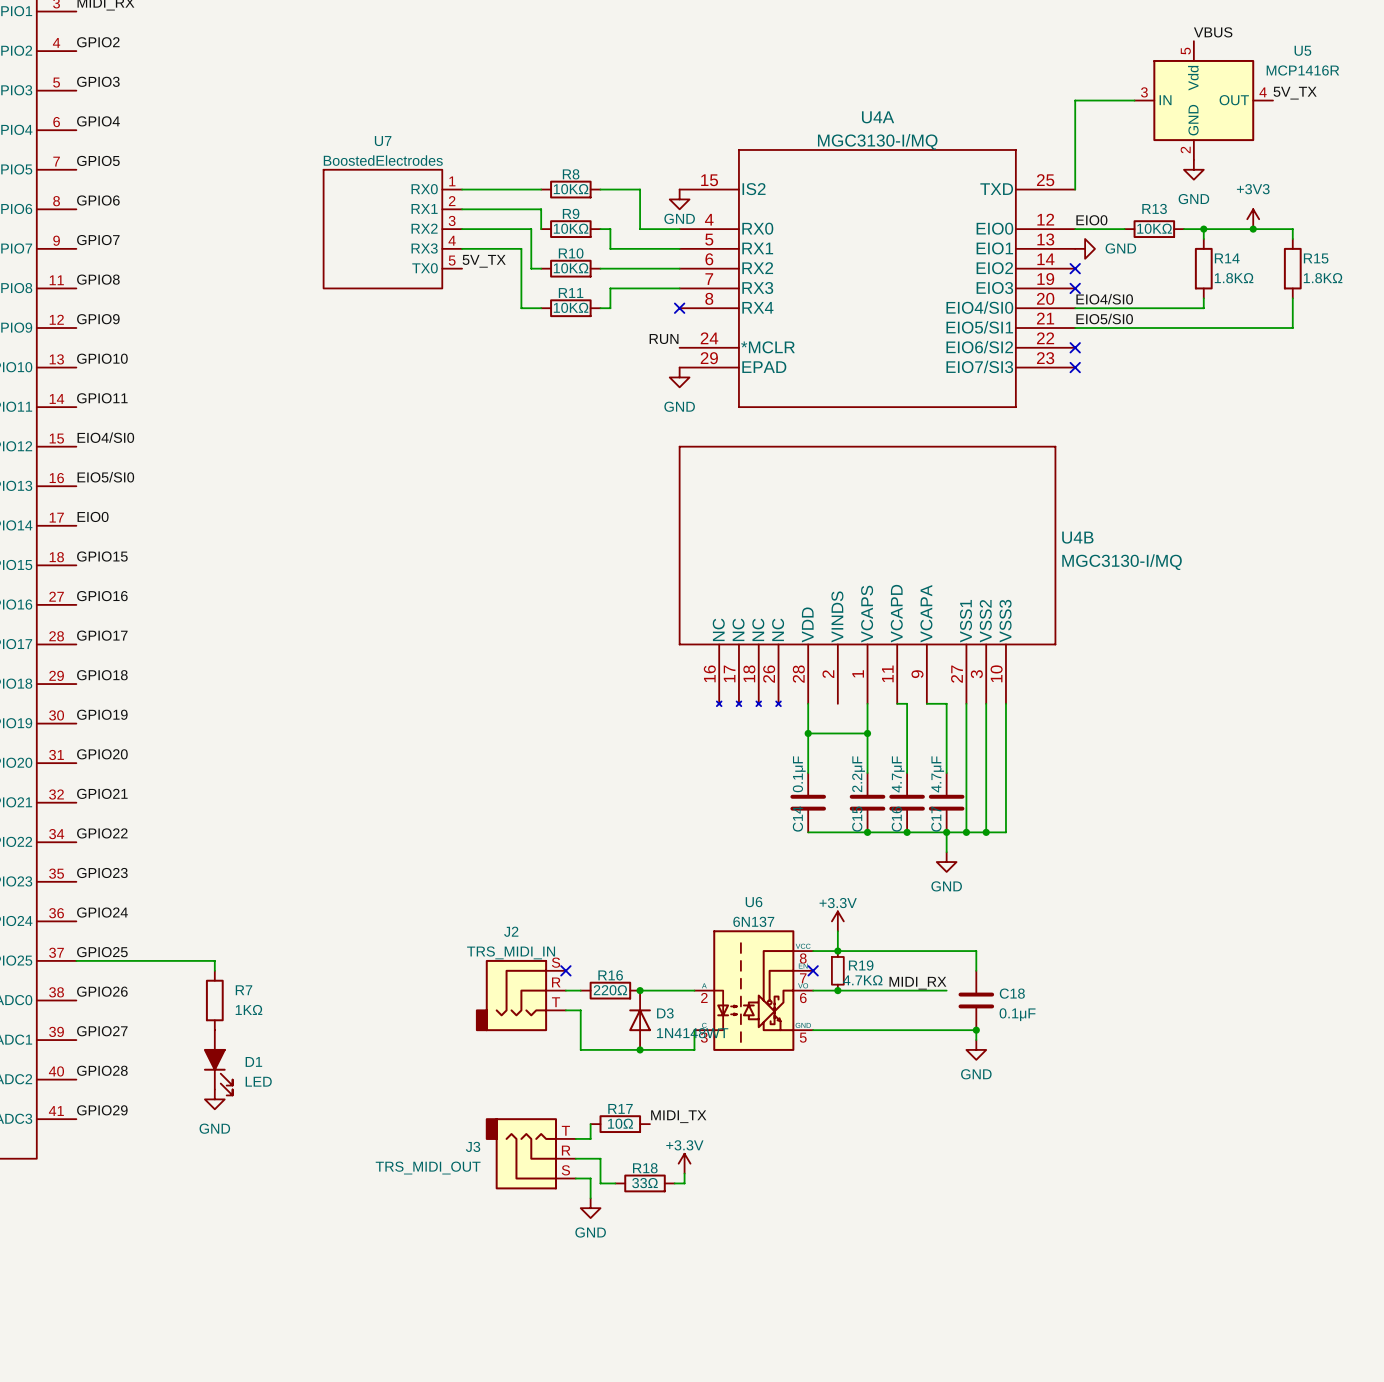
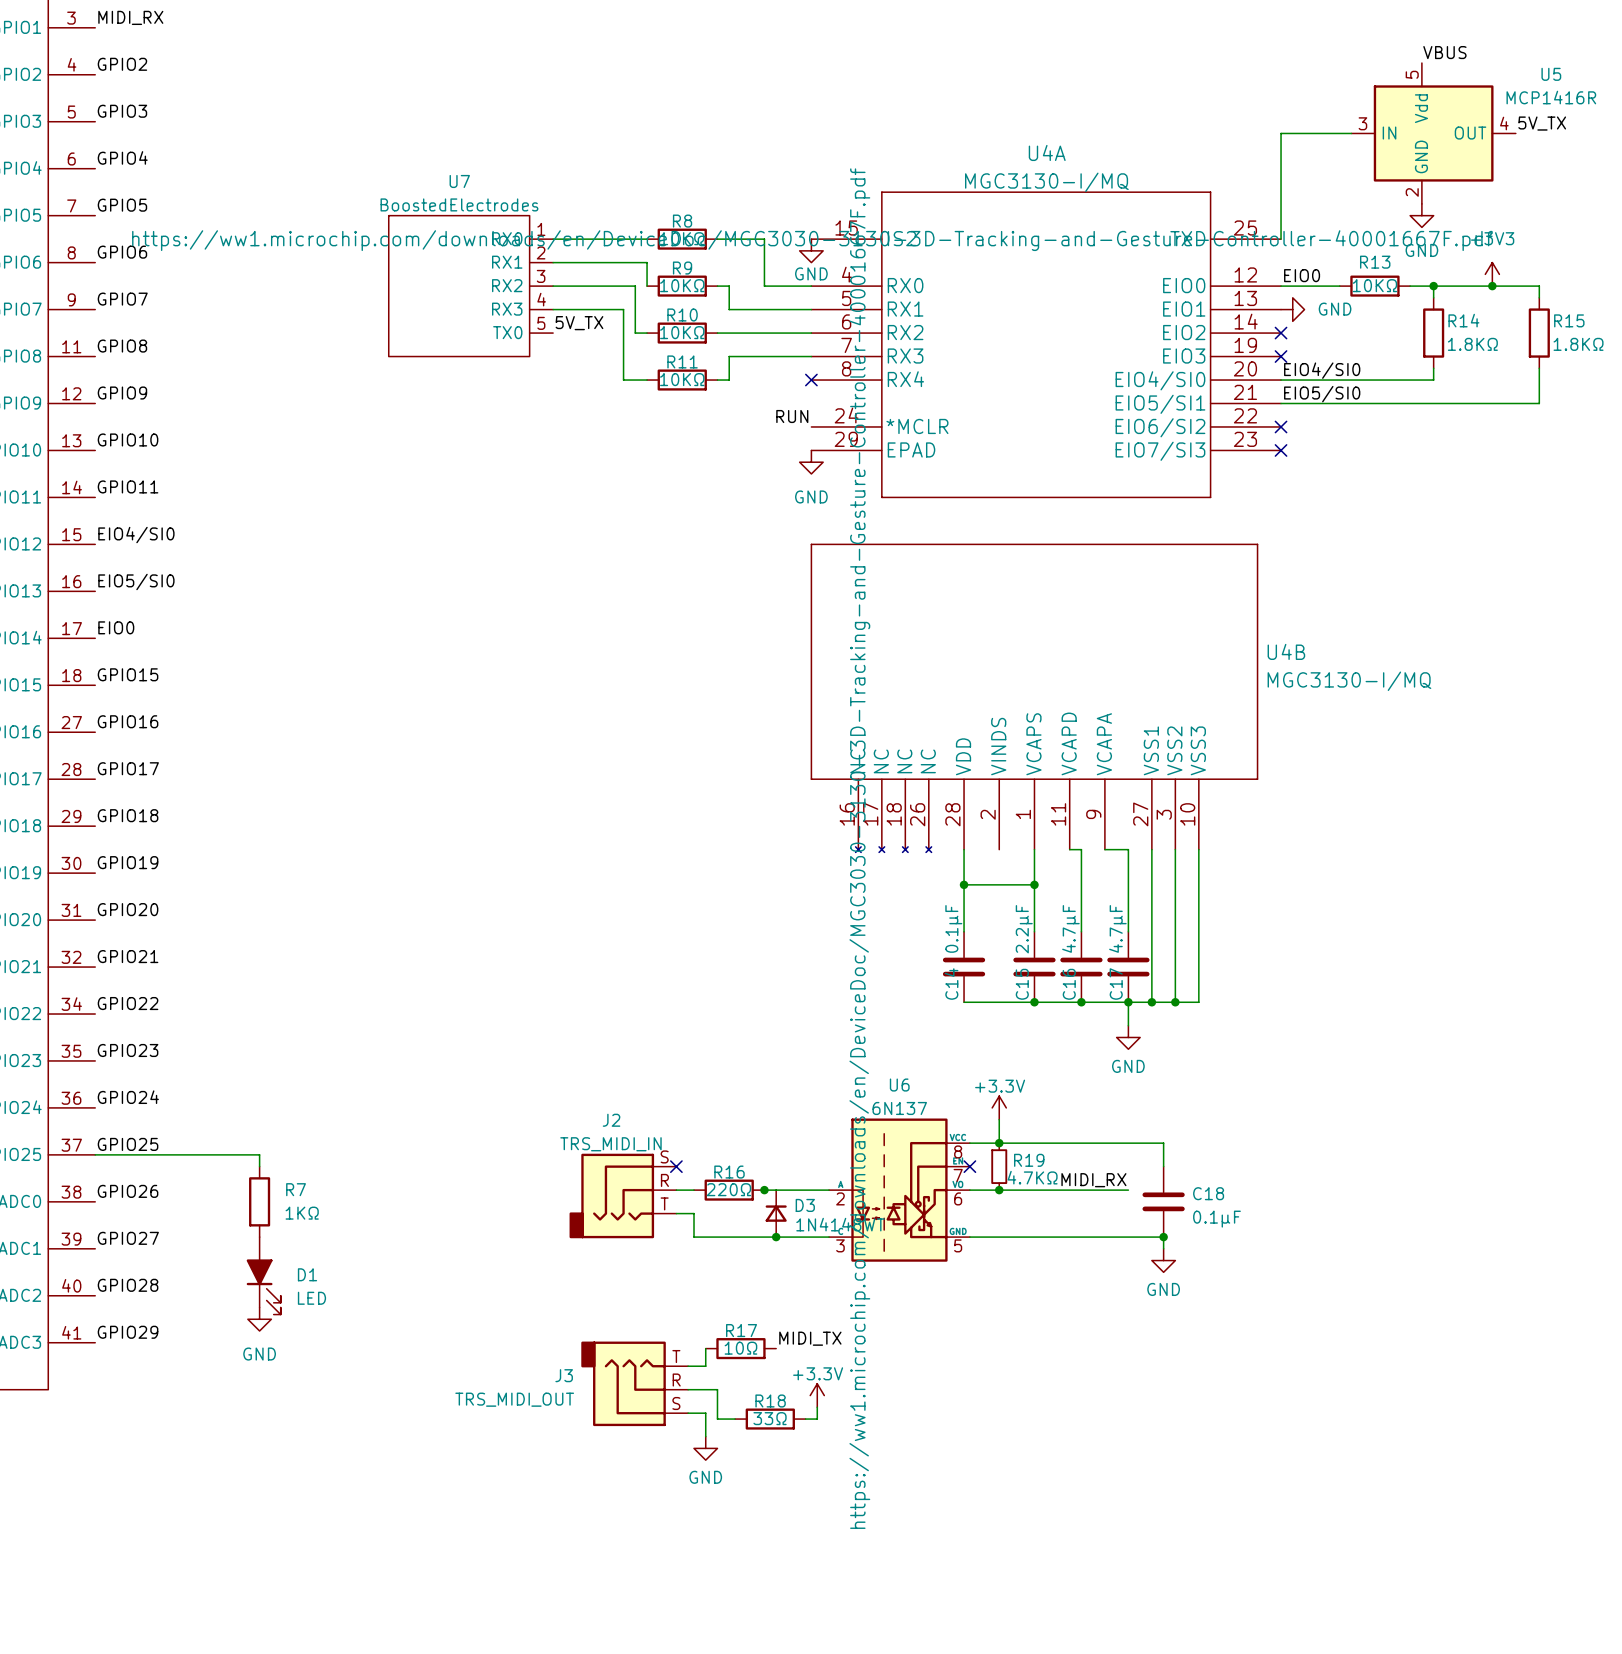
U4A text: none -> https://ww1.microchip.com/downloads/en/DeviceDoc/MGC3030-3130-3D-Tracking-and-Gesture-Controller-40001667F.pdf (812, 240)
U4B text: none -> https://ww1.microchip.com/downloads/en/DeviceDoc/MGC3030-3130-3D-Tracking-and-Gesture-Controller-40001667F.pdf (859, 848)
D3 symbol: [629, 990, 651, 1050] -> [765, 1190, 787, 1238]
wire: (580, 1030) (580, 1049) (694, 1049) (694, 1030) -> (694, 1237) (829, 1237)
junction position: (640, 1049) -> (776, 1237)

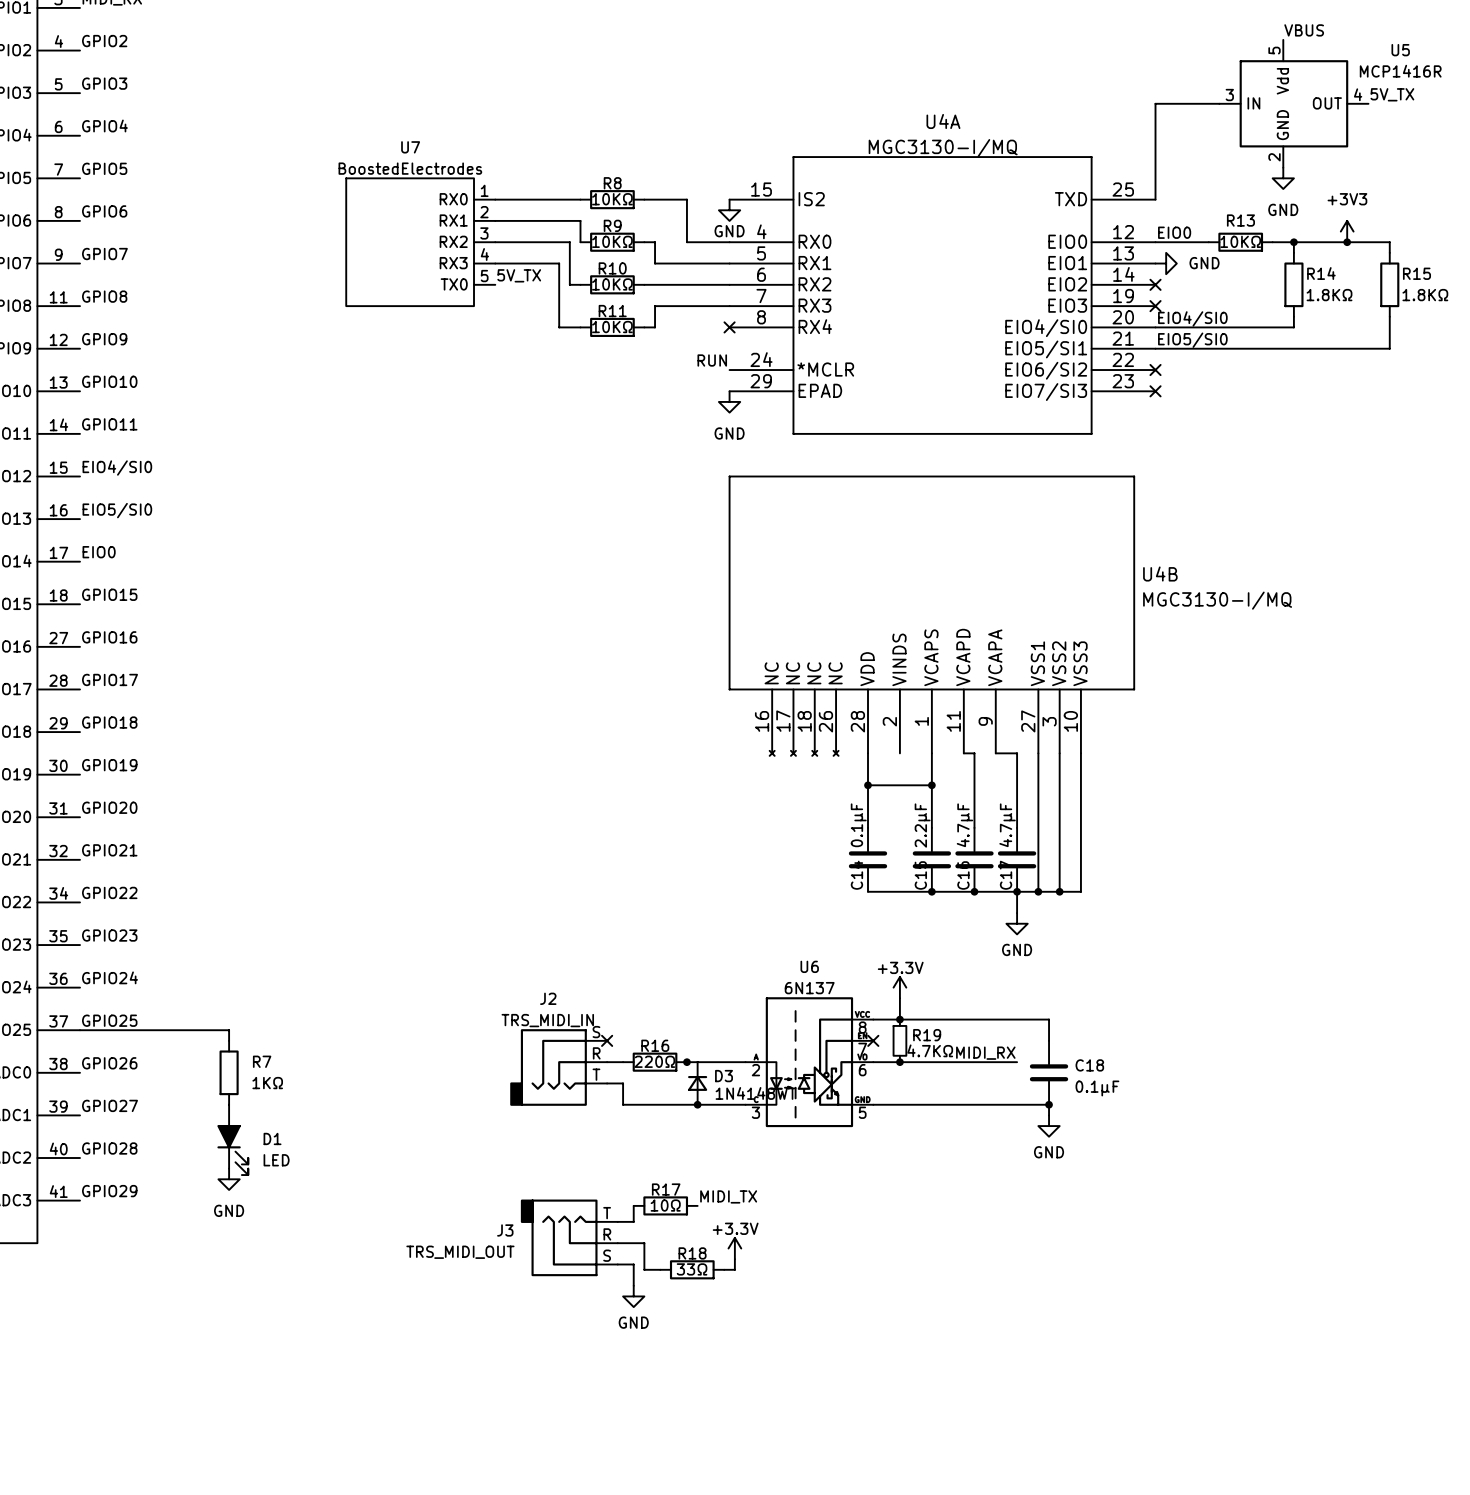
U4A text: https://ww1.microchip.com/downloads/en/DeviceDoc/MGC3030-3130-3D-Tracking-and-Gesture-Controller-40001667F.pdf (812, 240) -> none
U4B text: https://ww1.microchip.com/downloads/en/DeviceDoc/MGC3030-3130-3D-Tracking-and-Gesture-Controller-40001667F.pdf (859, 848) -> none

